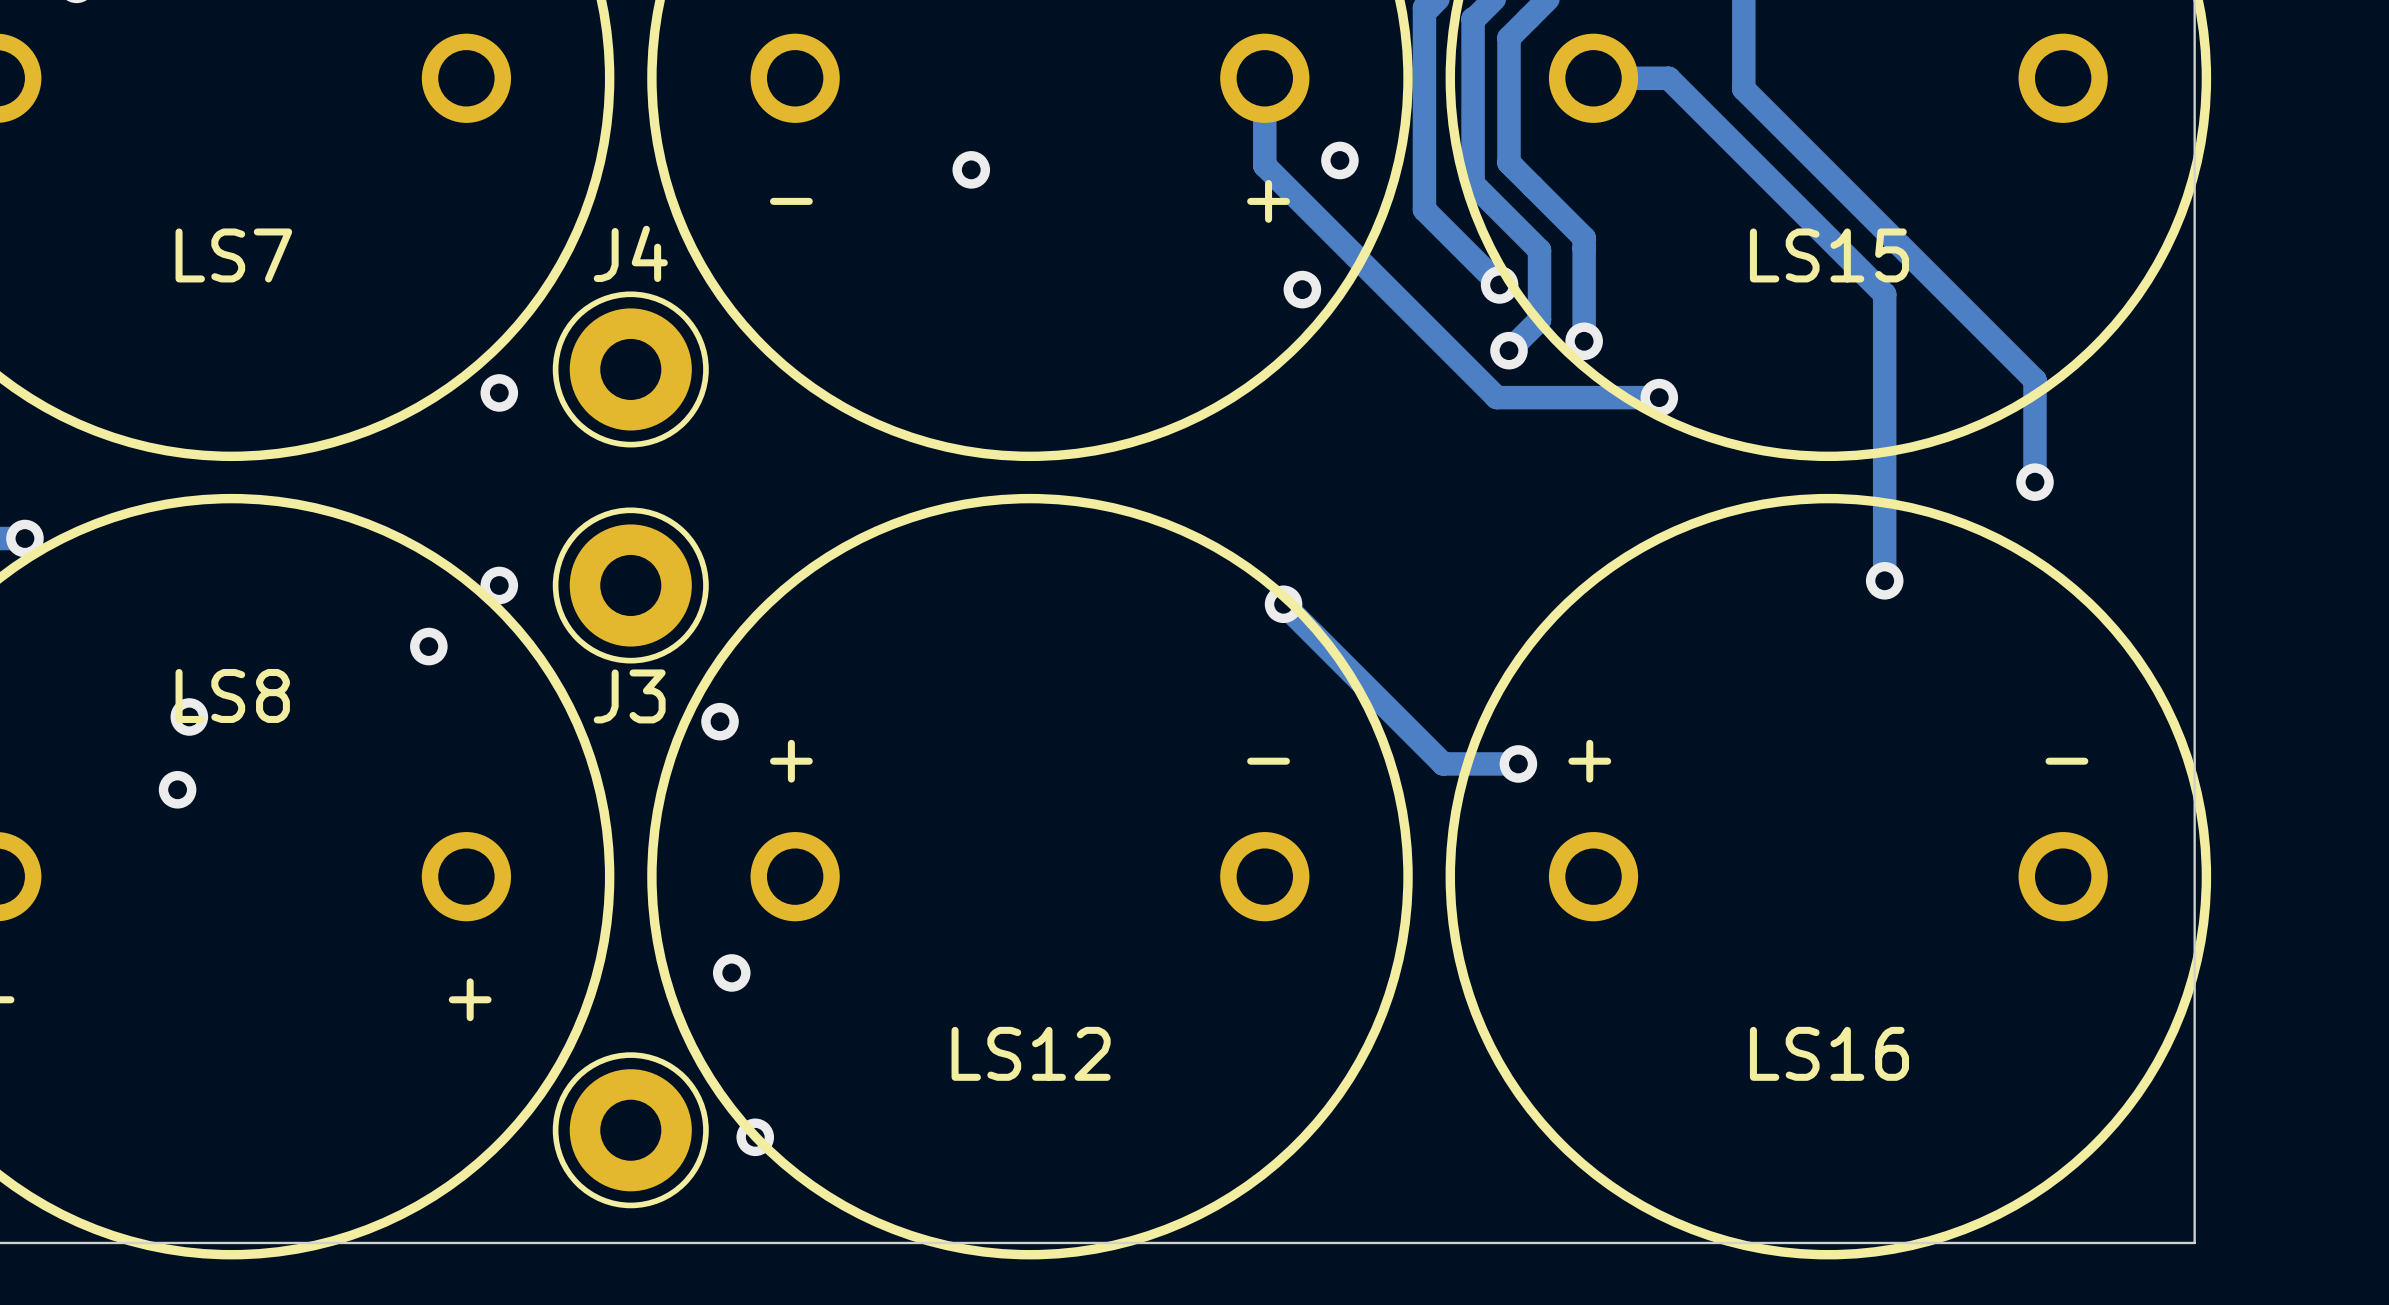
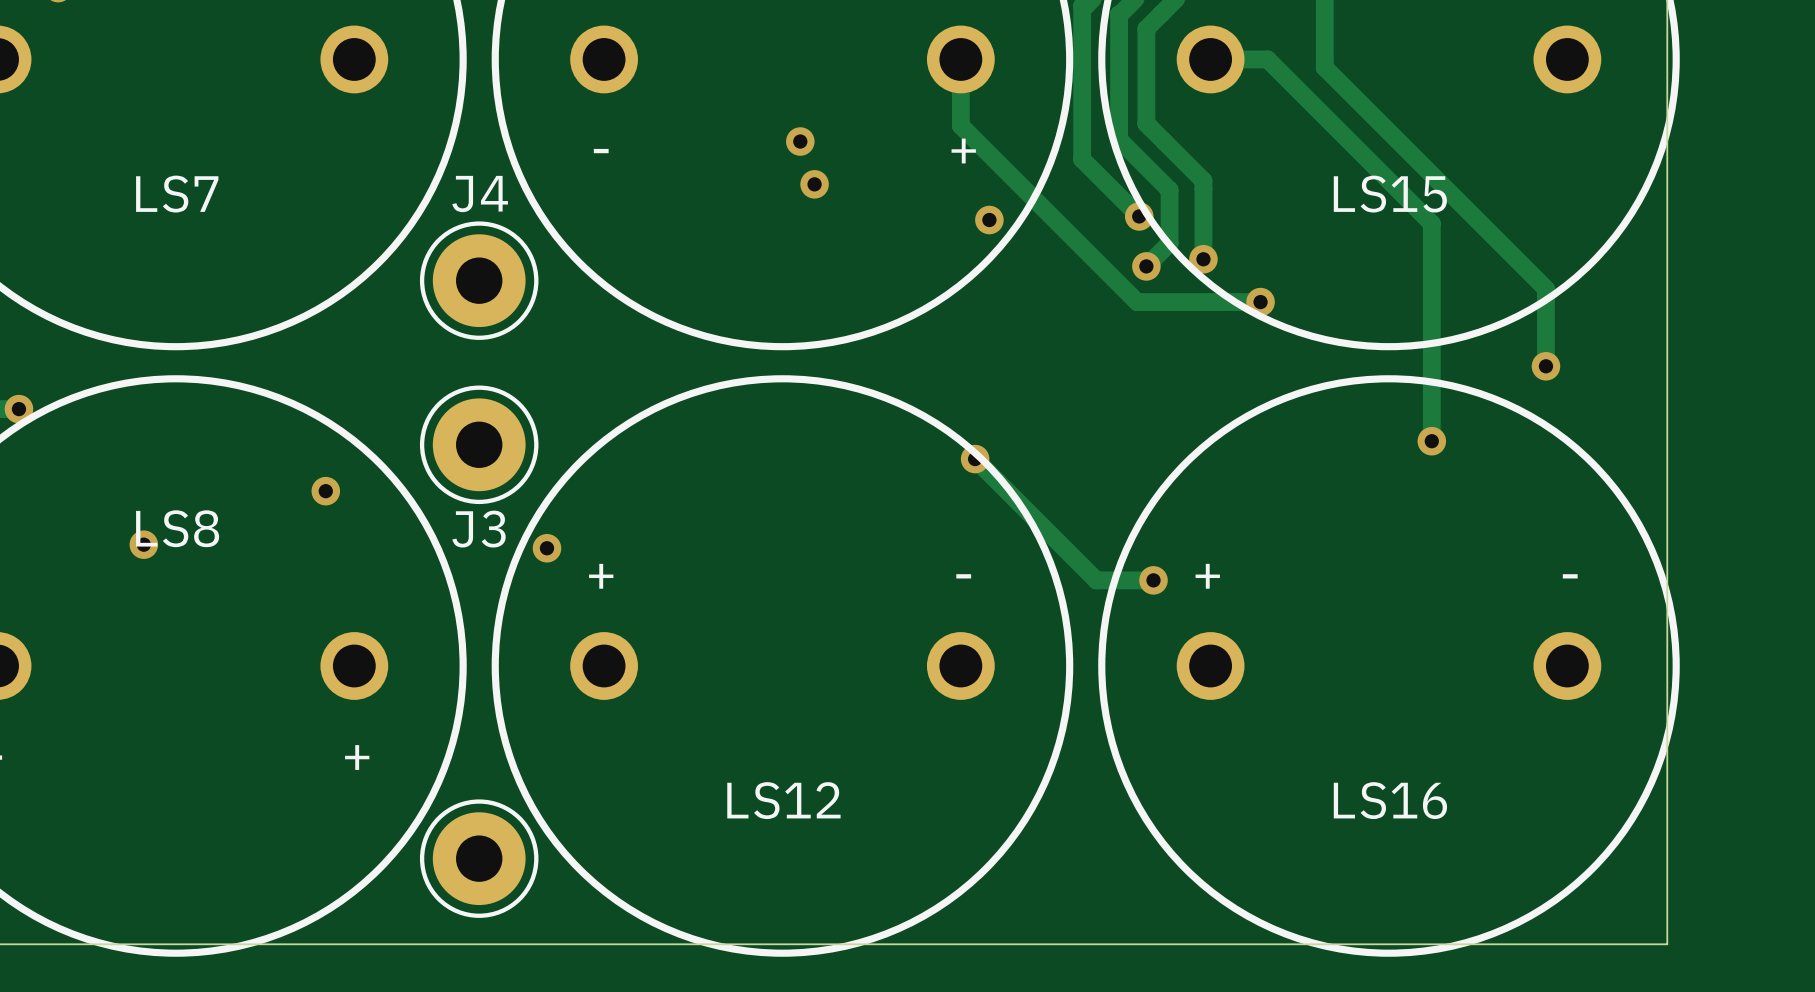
via: (1339, 160) -> none
via: (971, 169) -> none
via: none -> (800, 141)
via: none -> (814, 184)
via: (499, 392) -> none
via: (499, 585) -> none
via: (177, 789) -> none
via: (731, 972) -> none
via: (755, 1137) -> none

